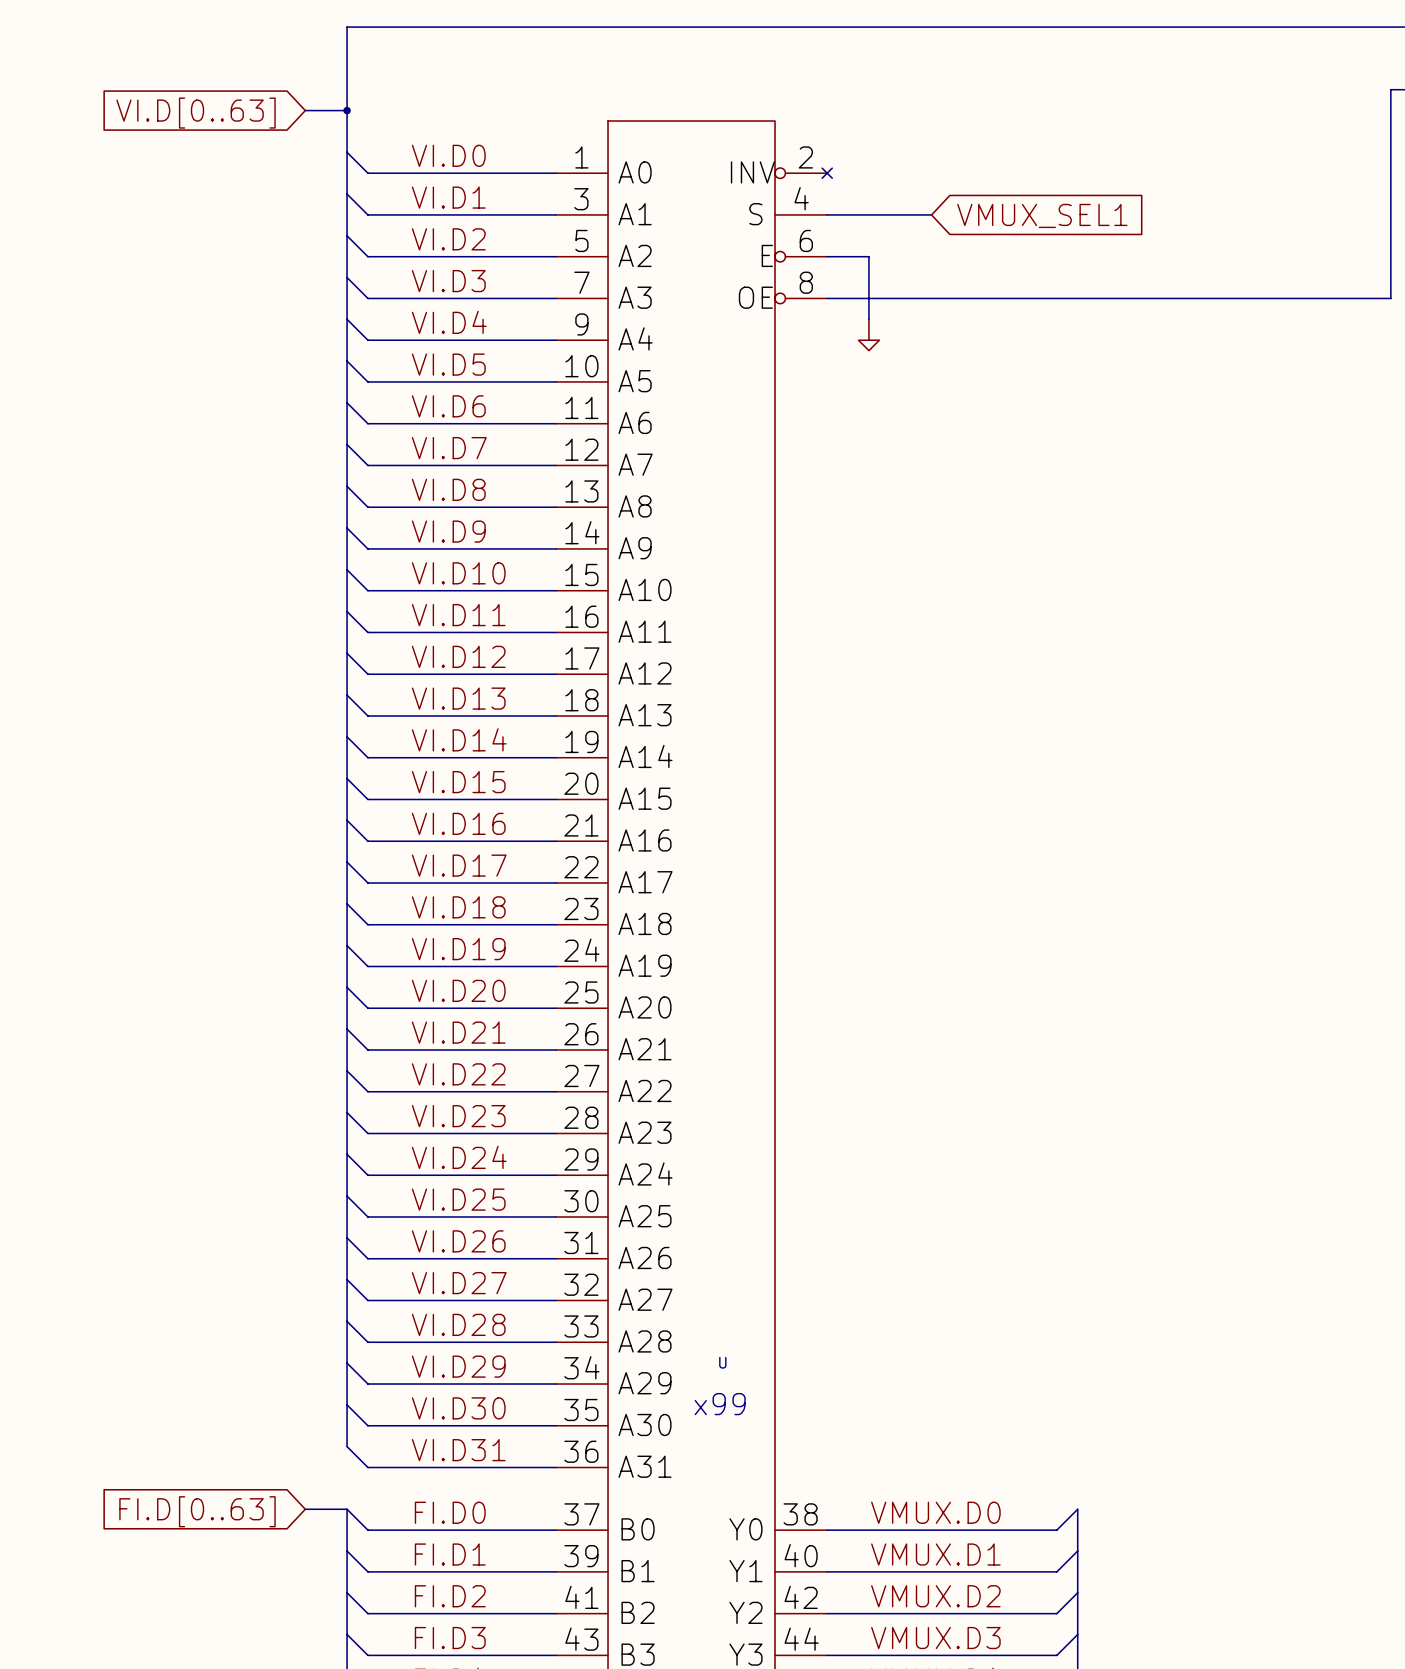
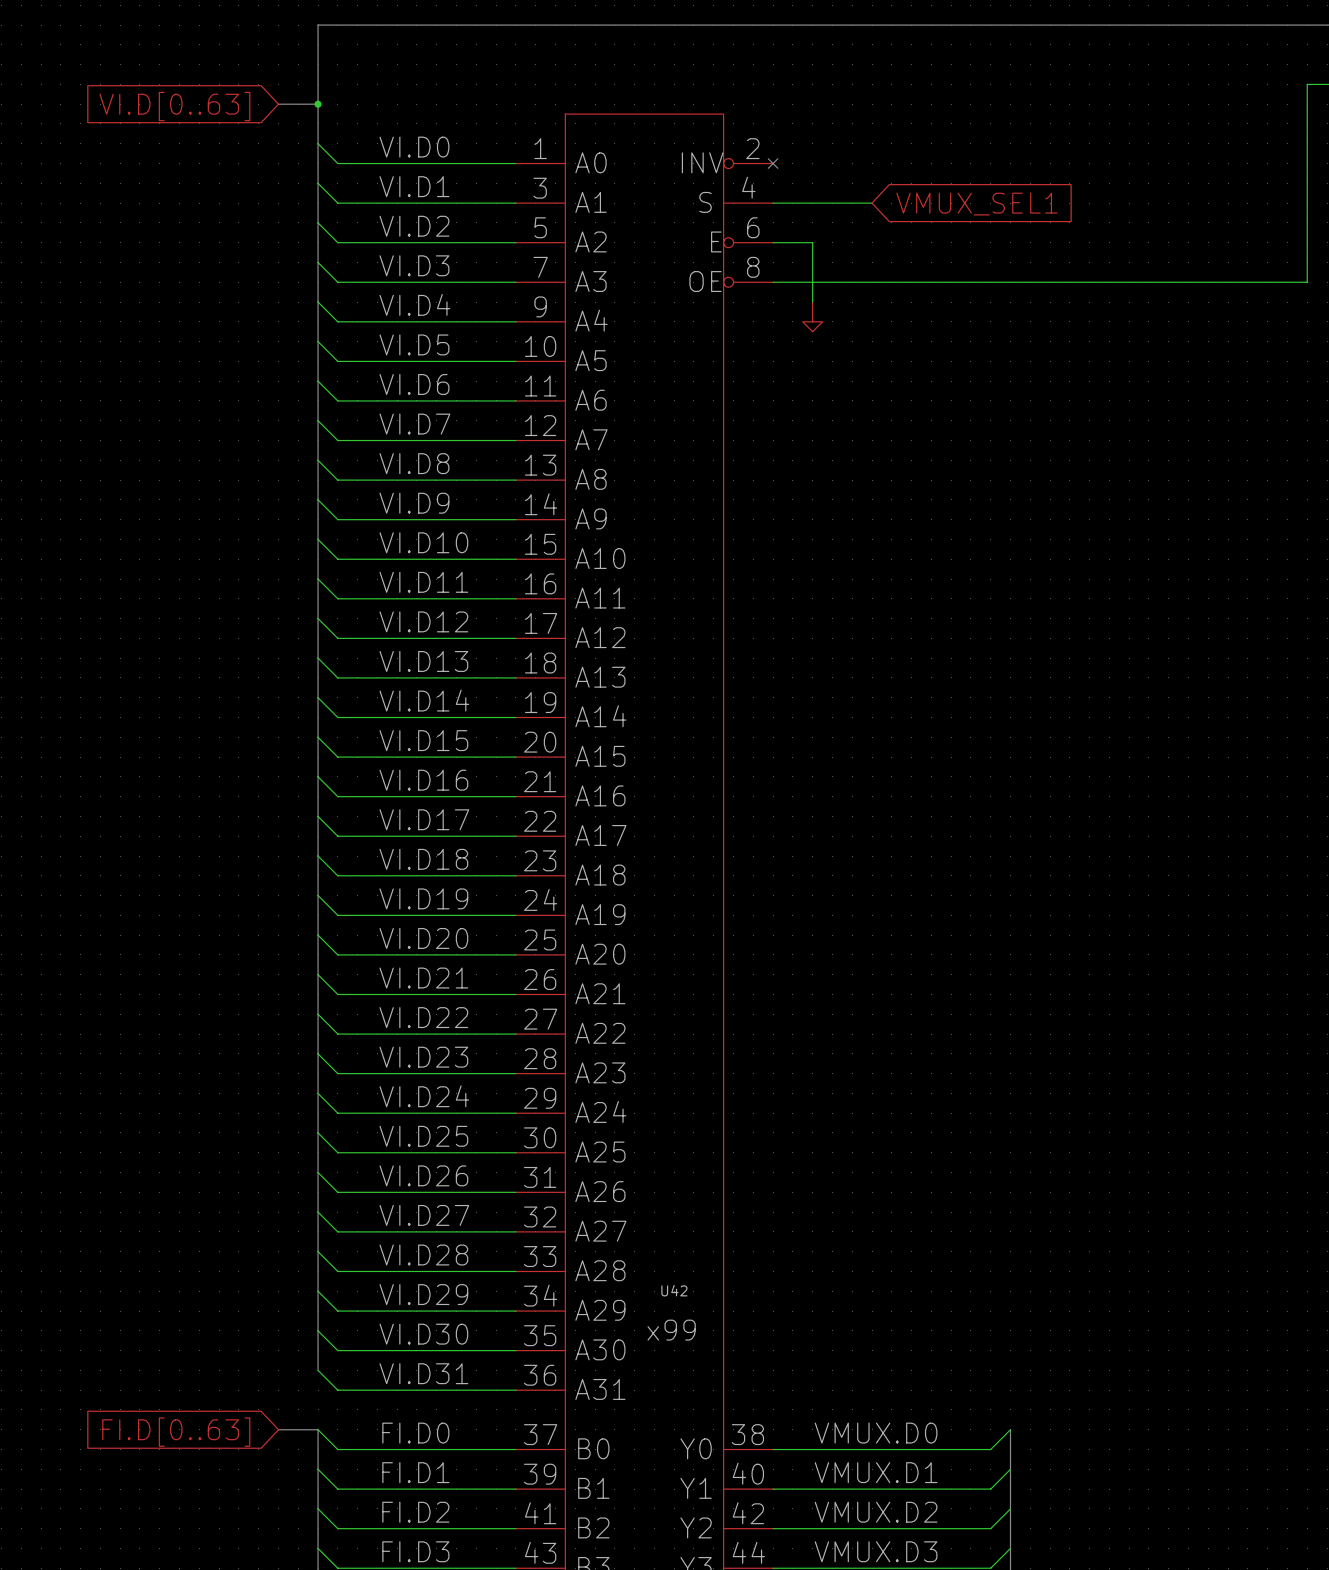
U name: U (722, 1362) -> U42 (674, 1290)

